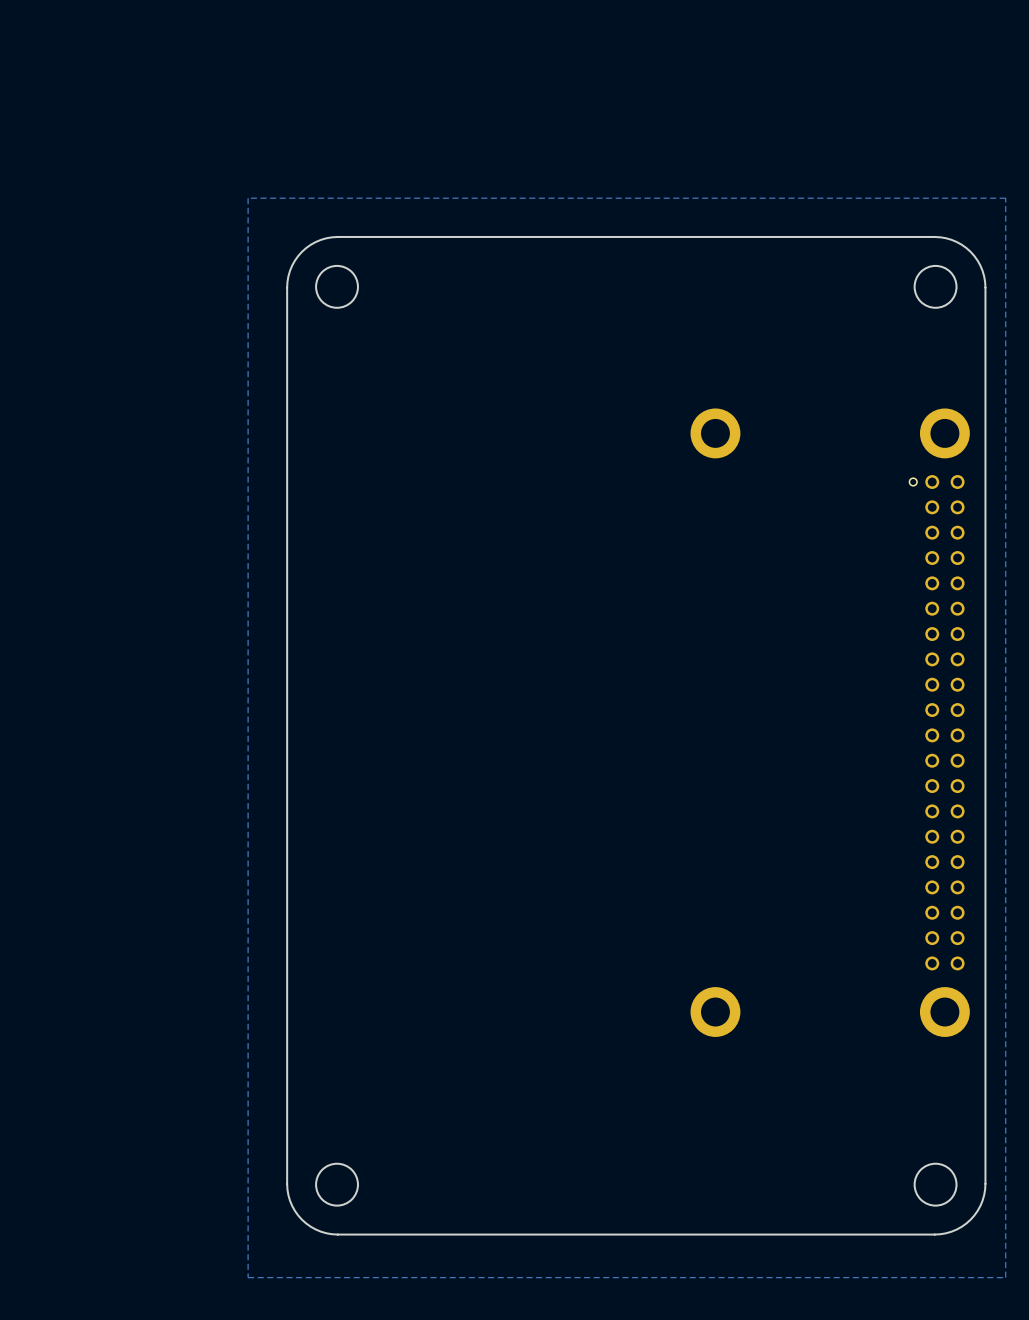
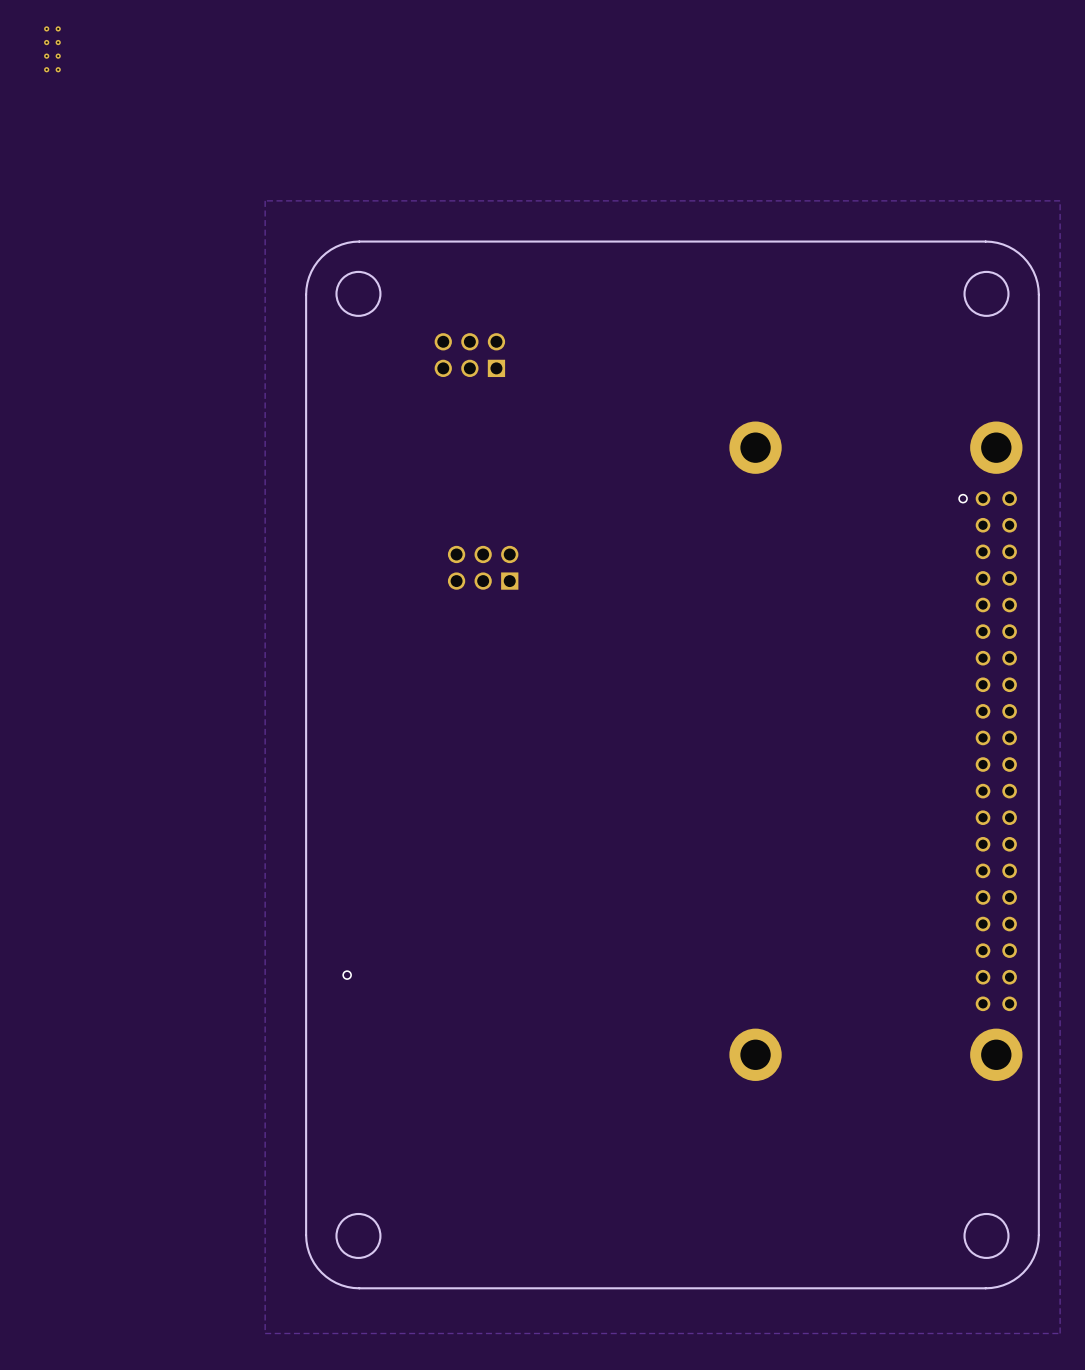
part: none -> (52, 49)
part: none -> (469, 355)
part: none -> (483, 567)
part: none -> (347, 975)

